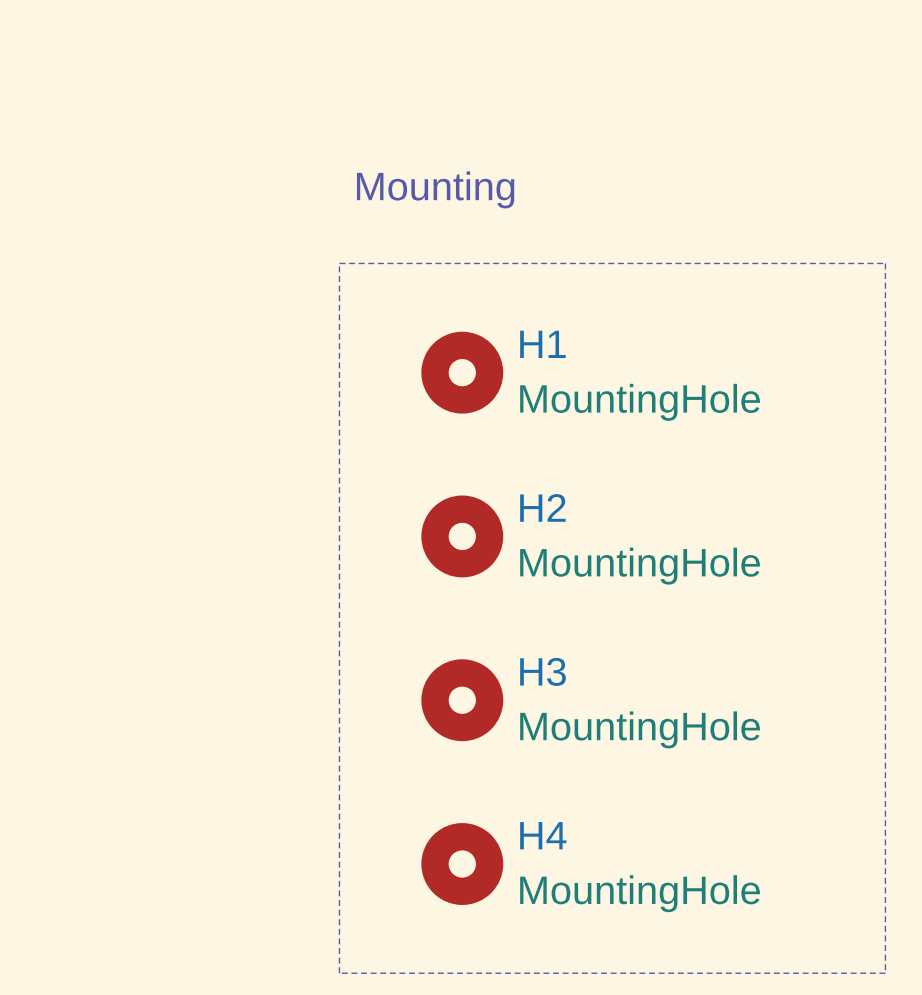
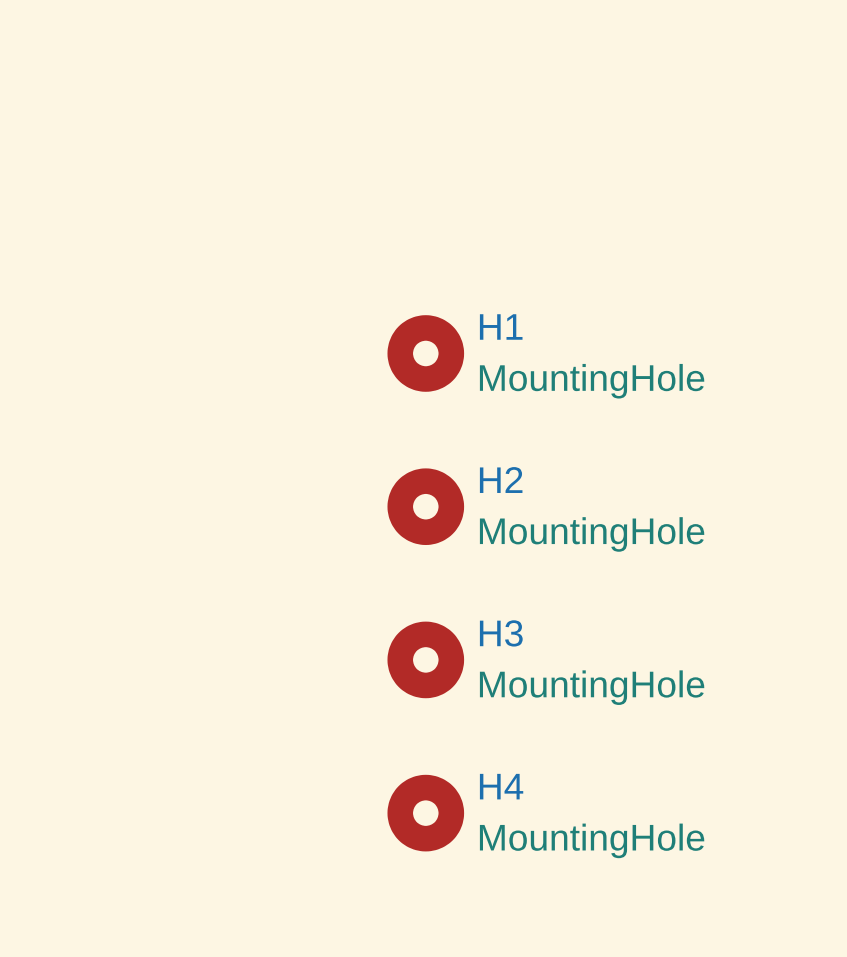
text: Mounting (435, 189) -> none
line: (339, 263) (885, 263) (885, 973) (339, 973) (339, 263) -> none

